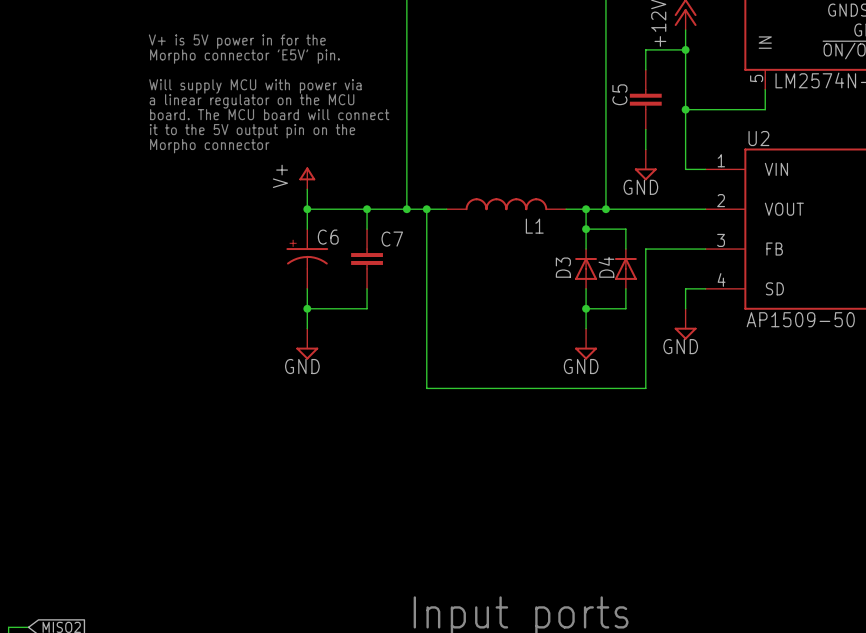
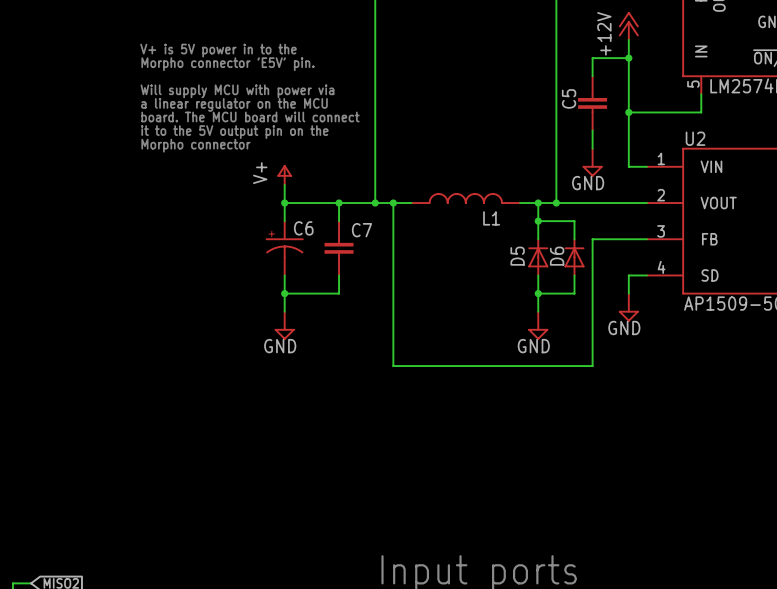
text: V+ is 5V power in for the (237, 41) -> V+ is 5V power in to the (218, 50)
D3 name: D3 (563, 267) -> D5 (517, 256)
D4 name: D4 (606, 267) -> D6 (557, 256)

